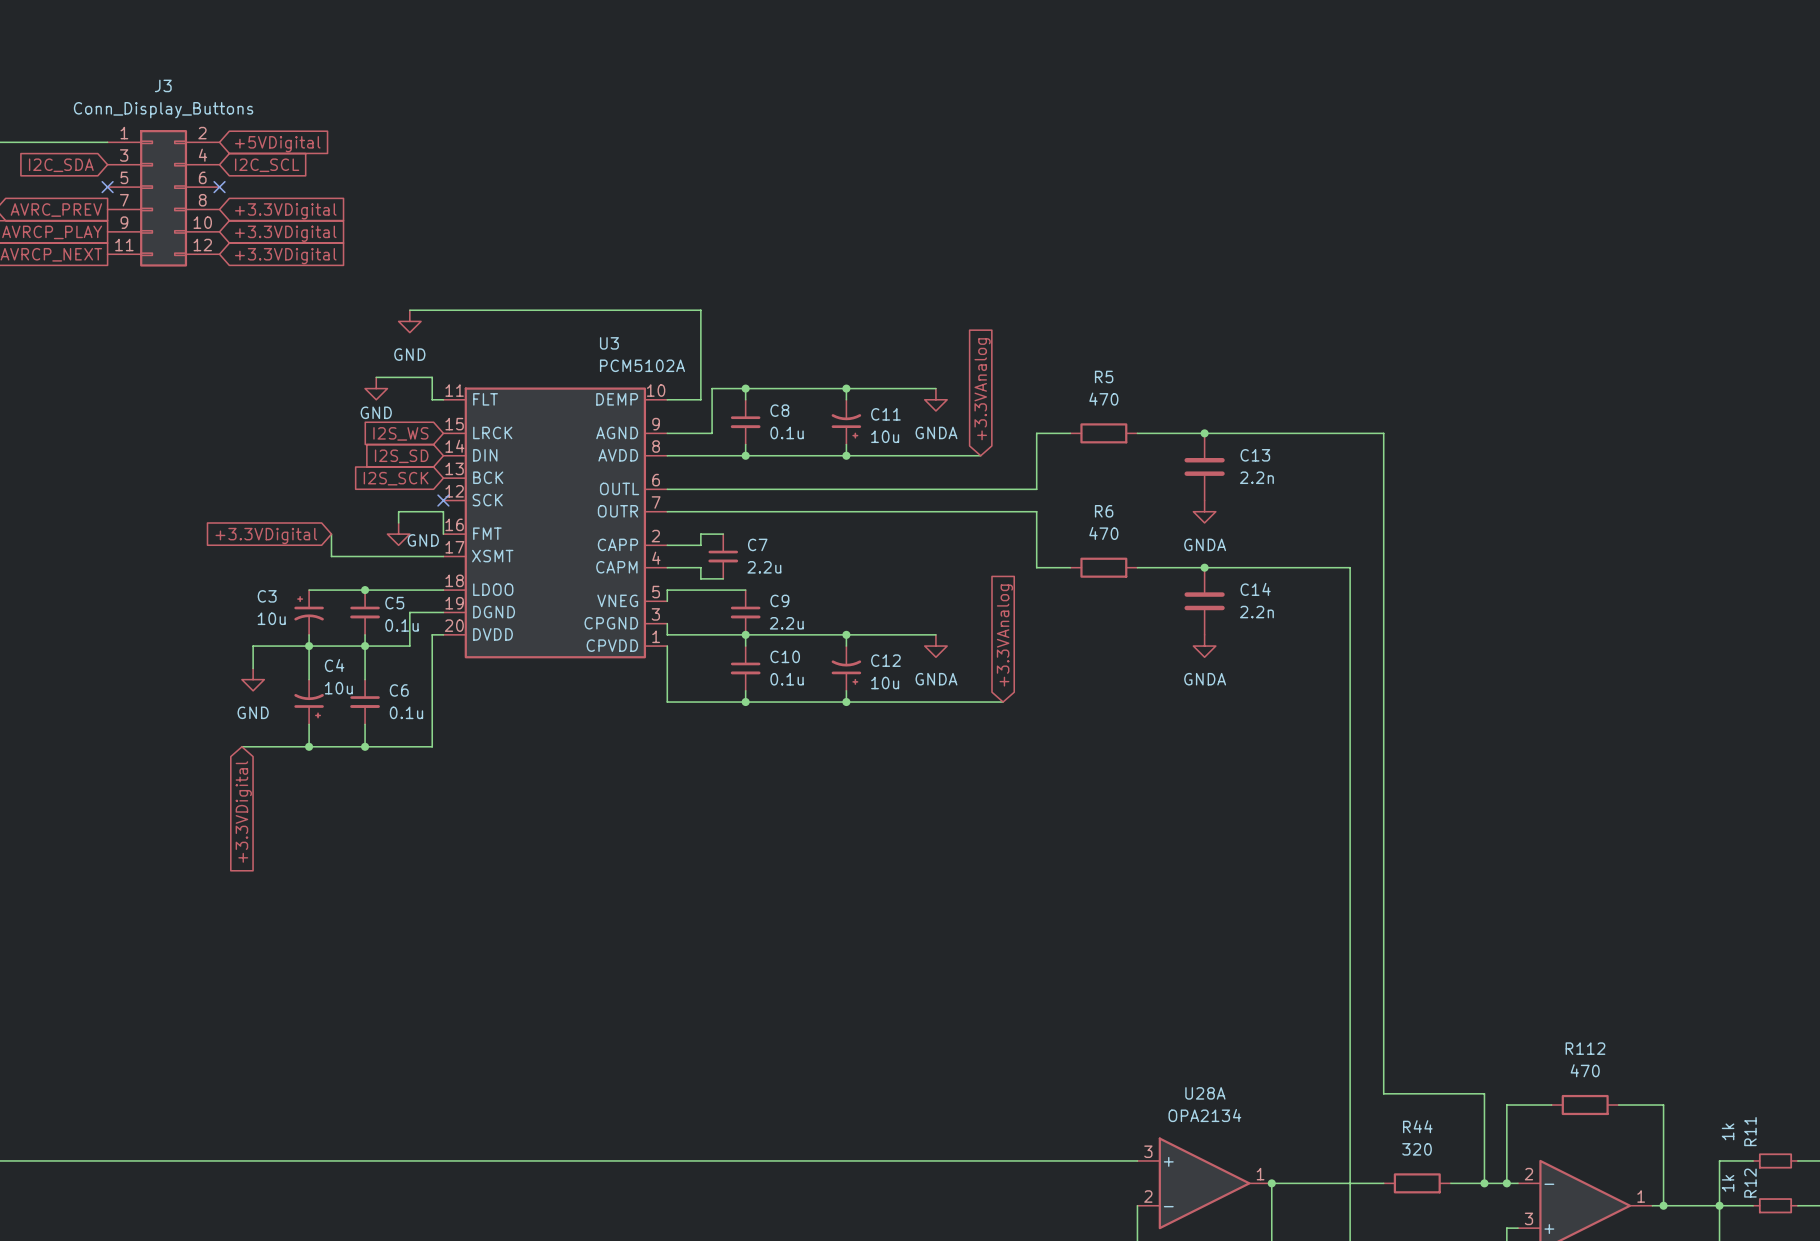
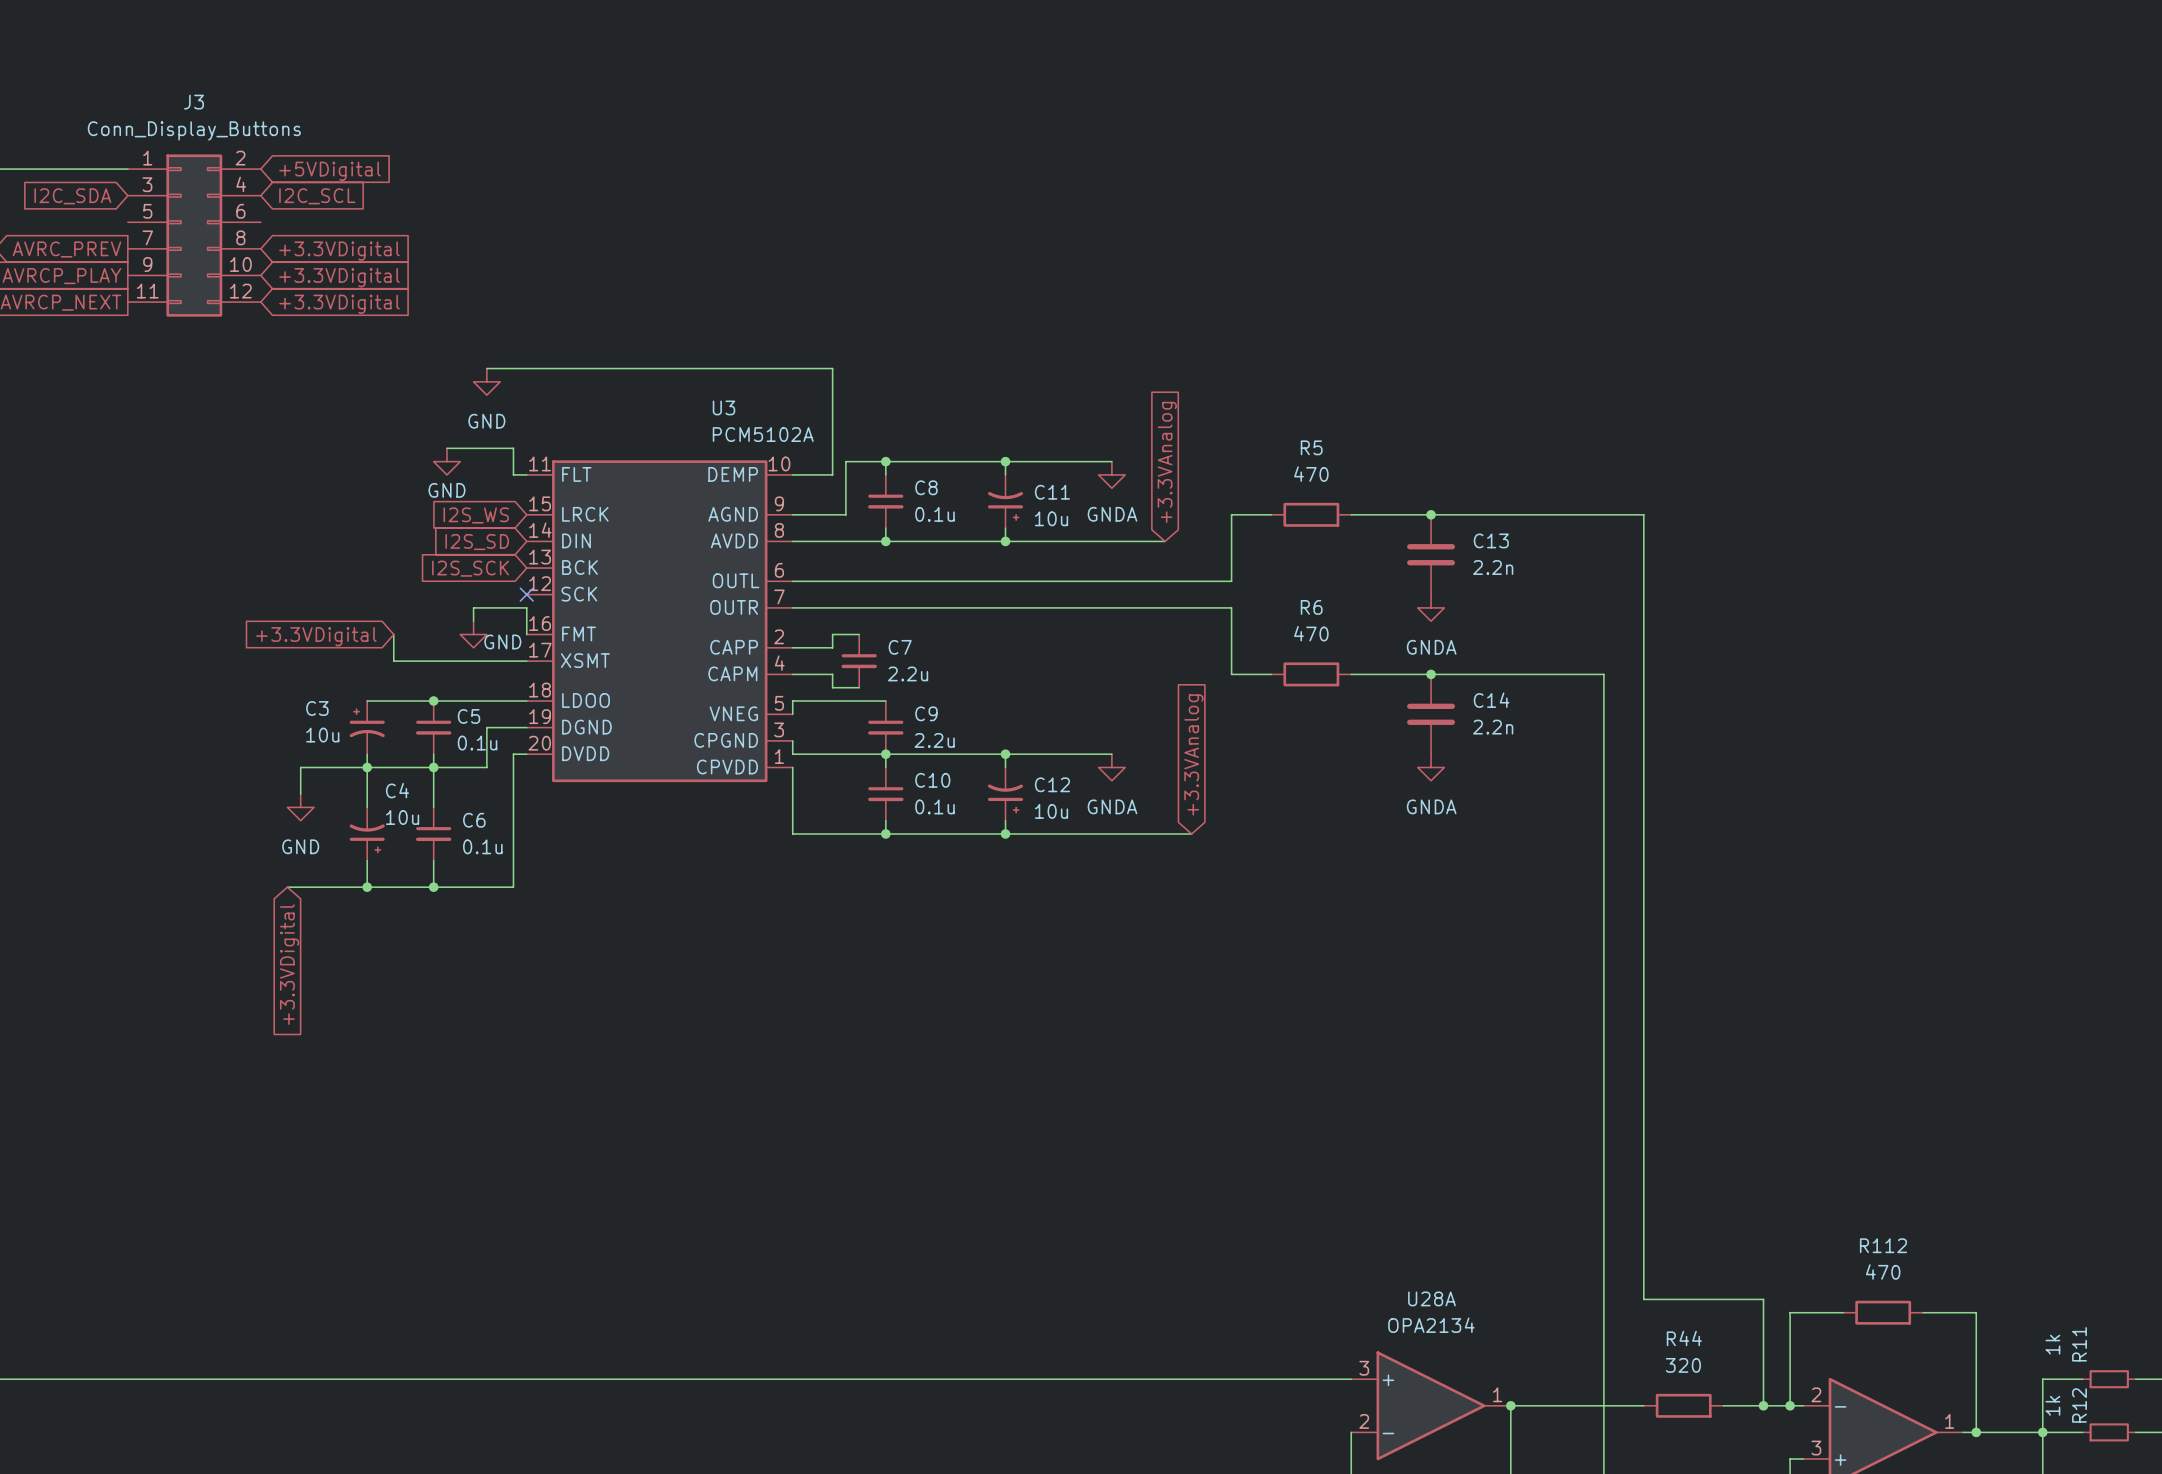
no-connect mark: (107, 187) -> none
no-connect mark: (219, 187) -> none

